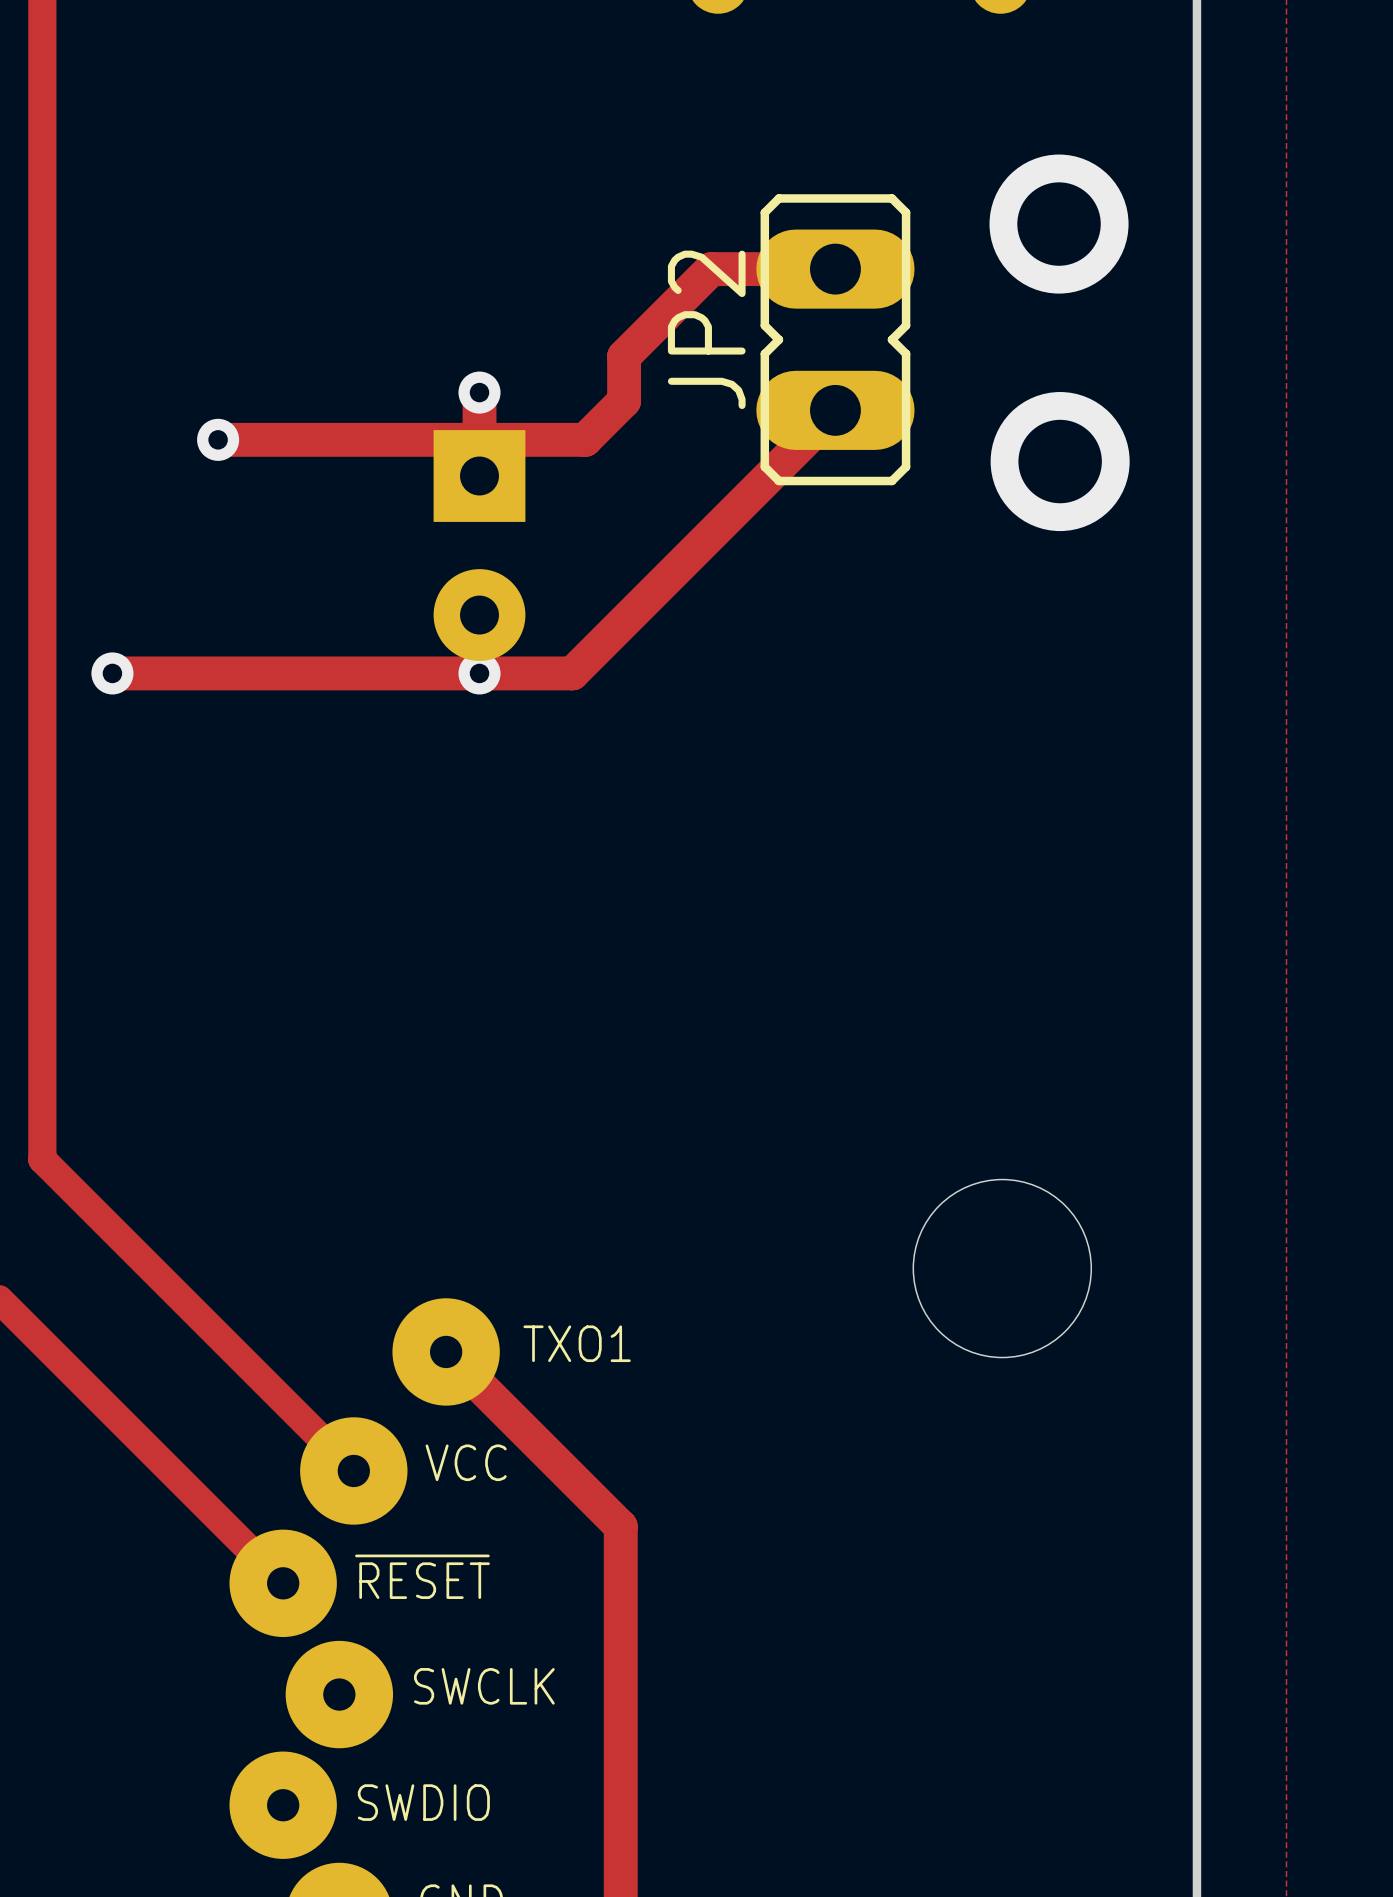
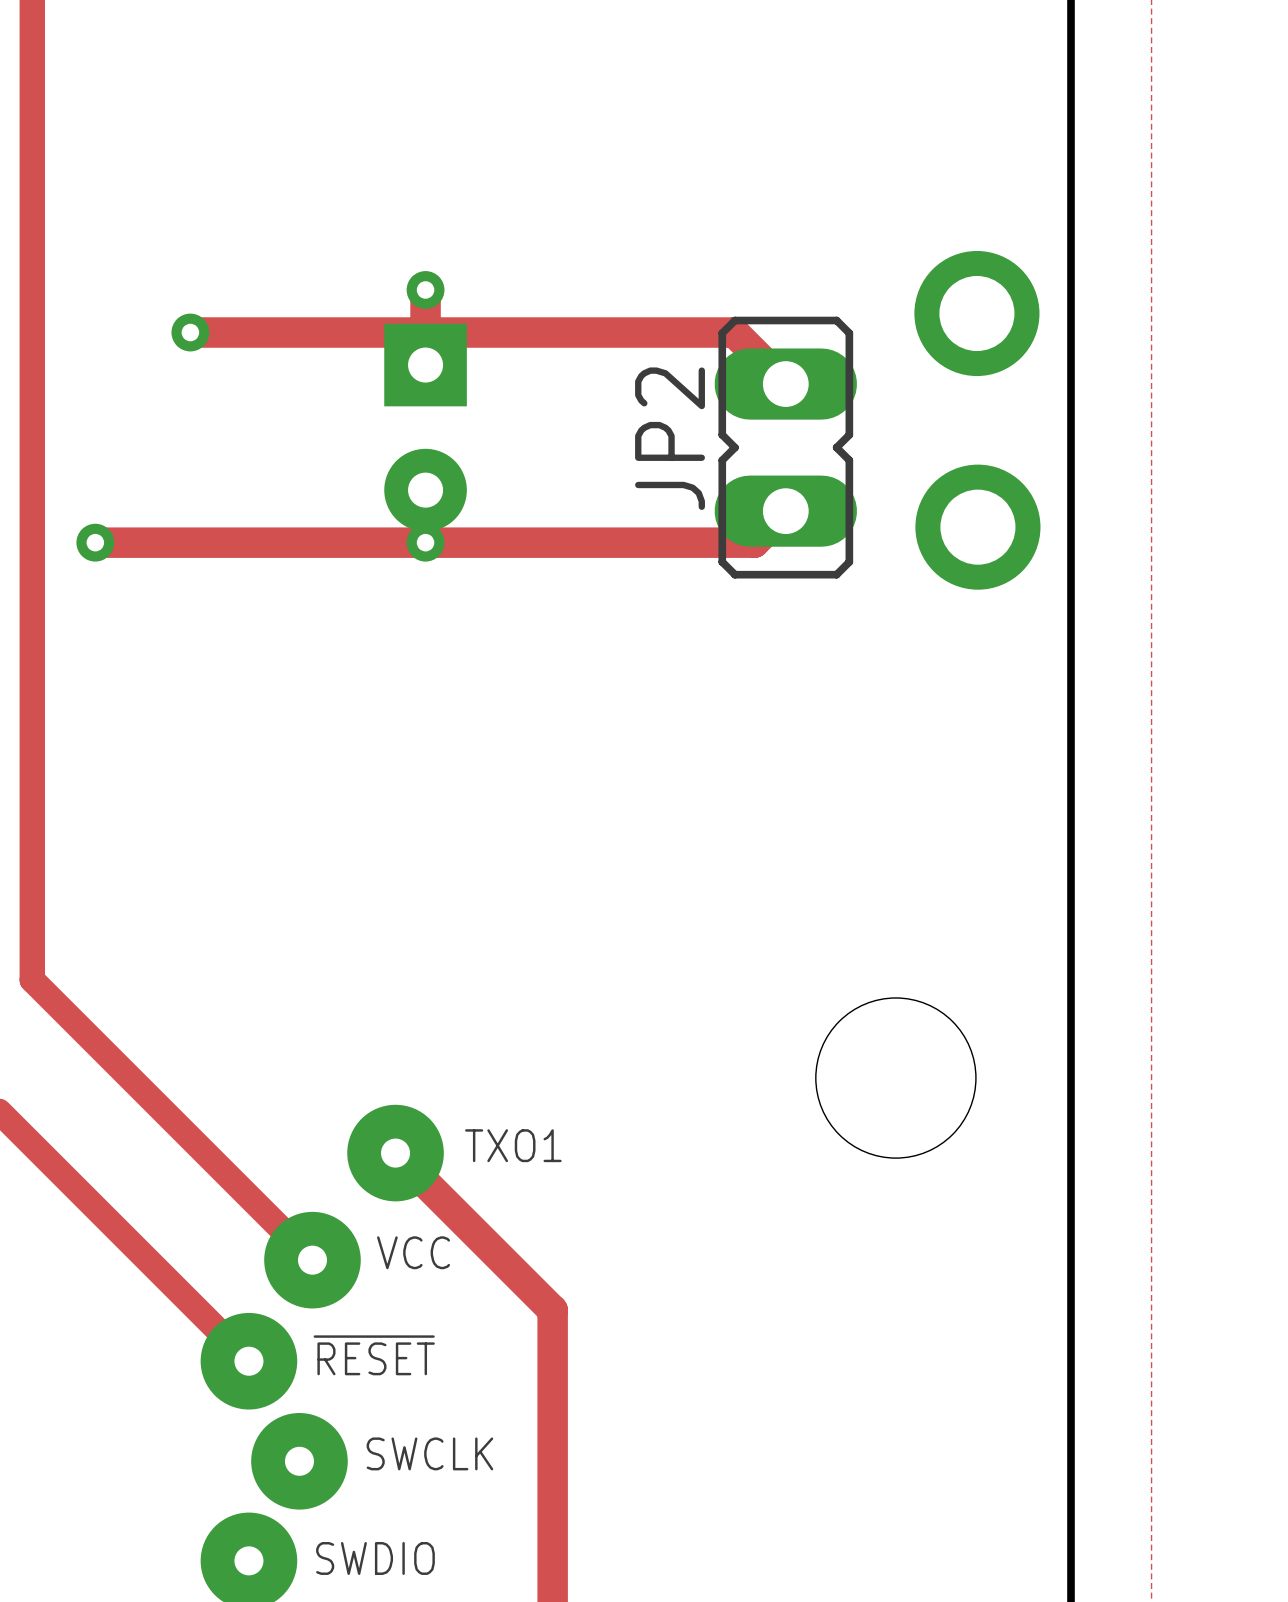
via: (1059, 224) -> none
track: (835, 269) (711, 269) (624, 356) (624, 400) (585, 439) -> (785, 384) (734, 332) (520, 332)
JP2 position: (835, 339) -> (785, 447)
track: (835, 410) (572, 673) -> (785, 511) (754, 542) (509, 542)
via position: (1060, 461) -> (976, 313)
via: none -> (977, 527)

